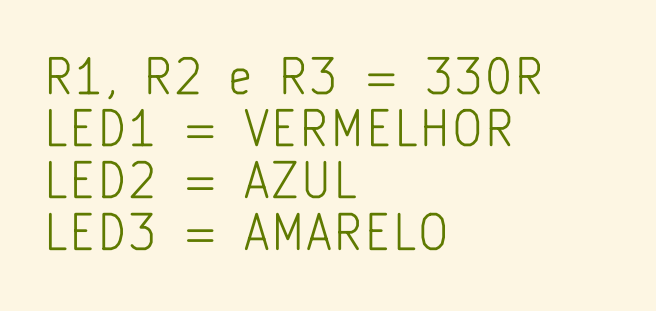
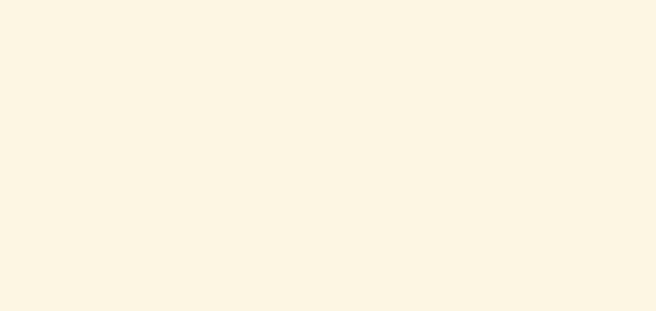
text: R1, R2 e R3 = 330R (294, 78) -> none
text: LED1 = VERMELHOR (279, 127) -> none
text: LED2 = AZUL (202, 179) -> none
text: LED3 = AMARELO (246, 231) -> none

